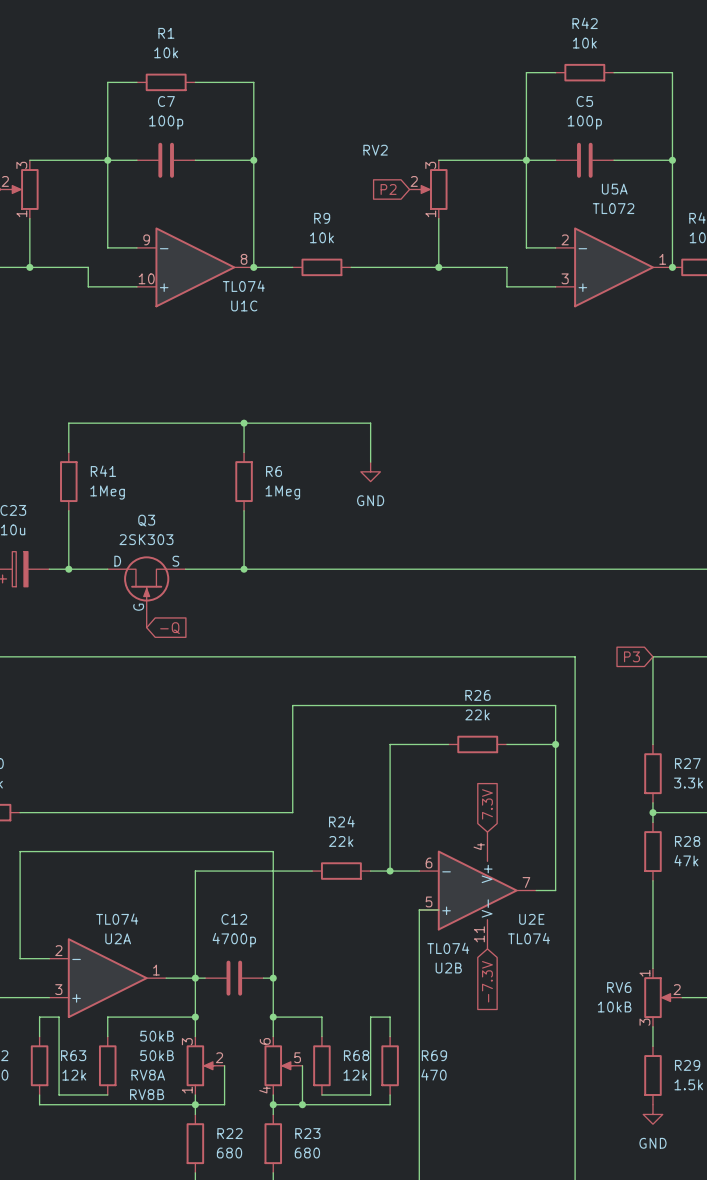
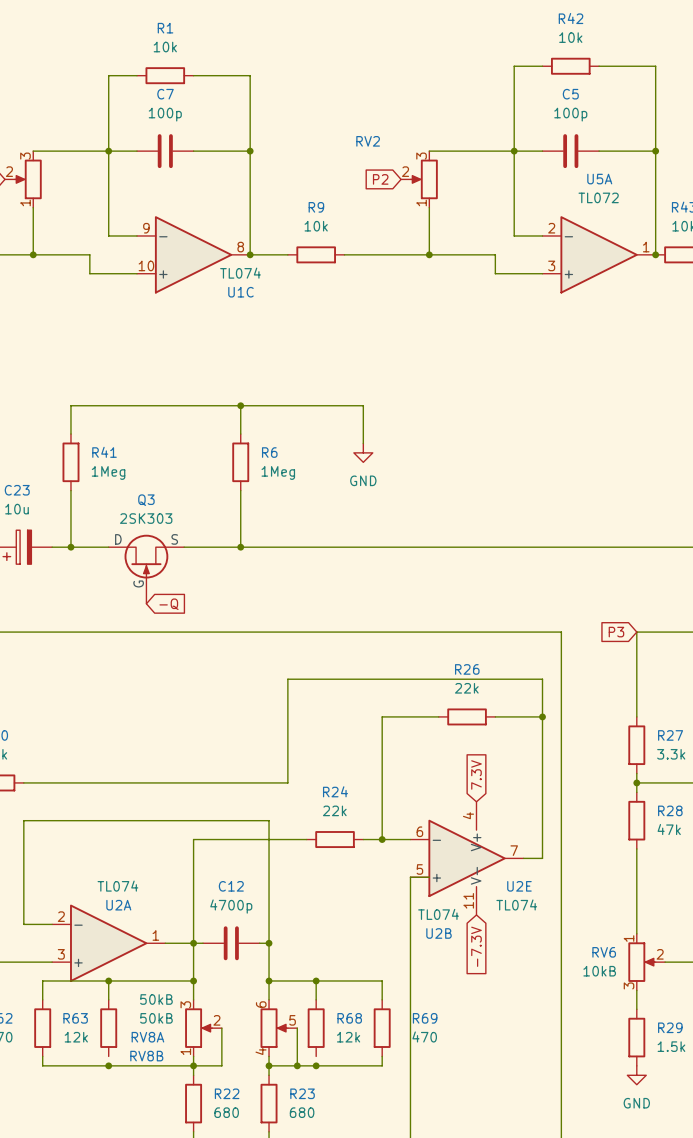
wire: (59, 1017) (59, 1094) (107, 1094) -> (61, 980) (108, 980)
junction: none -> (108, 980)
junction: none -> (316, 980)
wire: (370, 1017) (370, 1094) (321, 1094) -> (363, 980) (316, 980)
junction: none -> (108, 1065)
junction: none -> (316, 1065)

